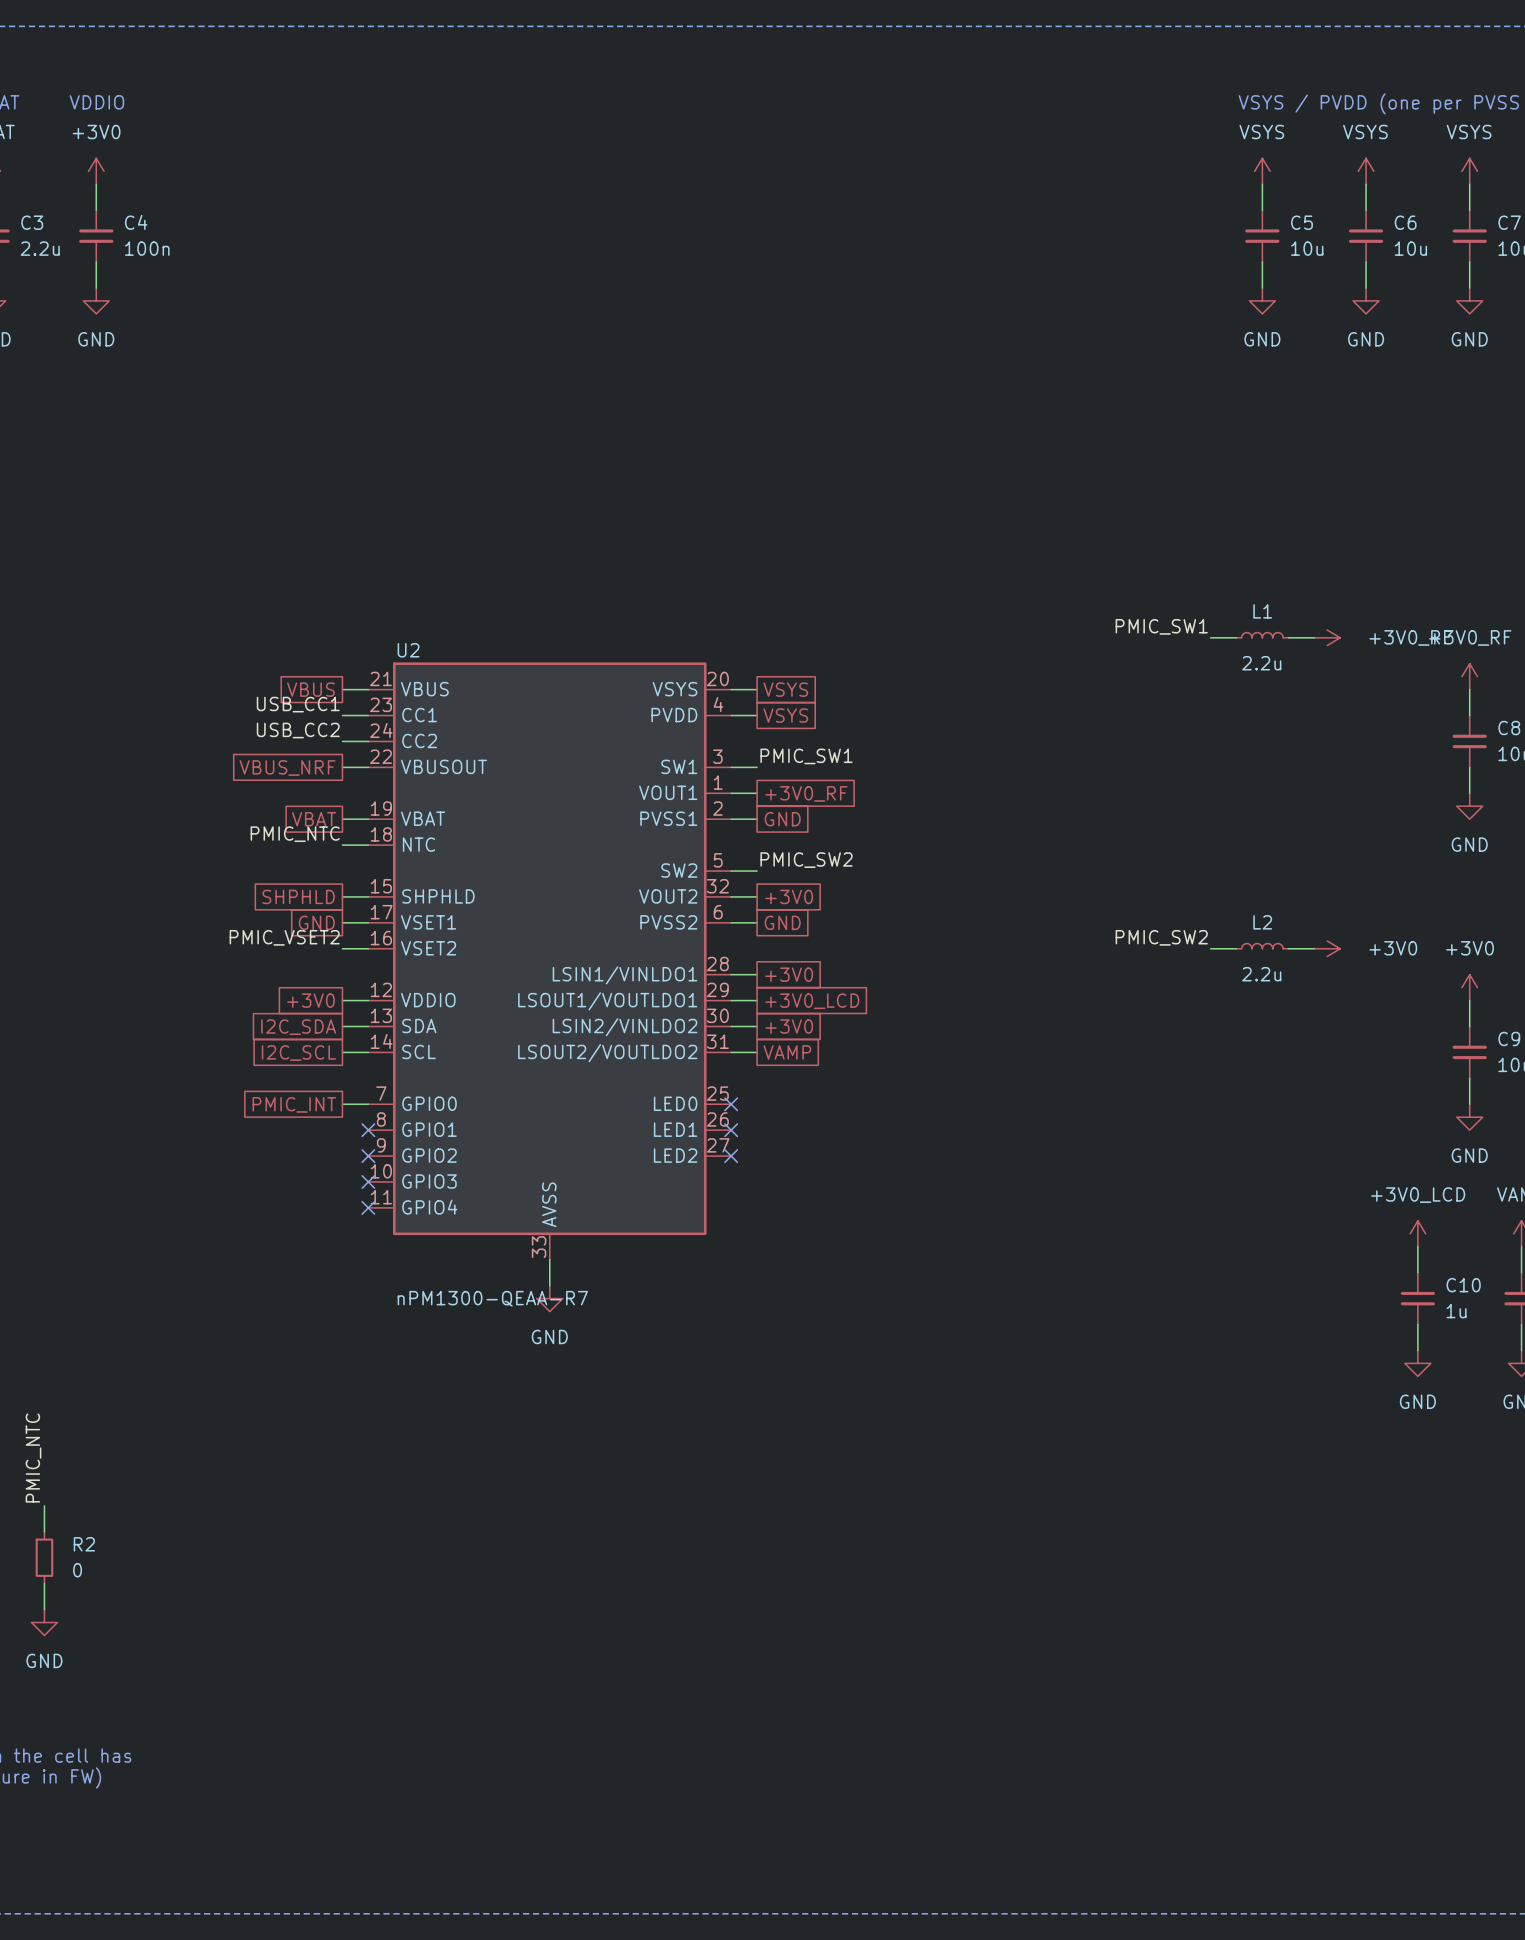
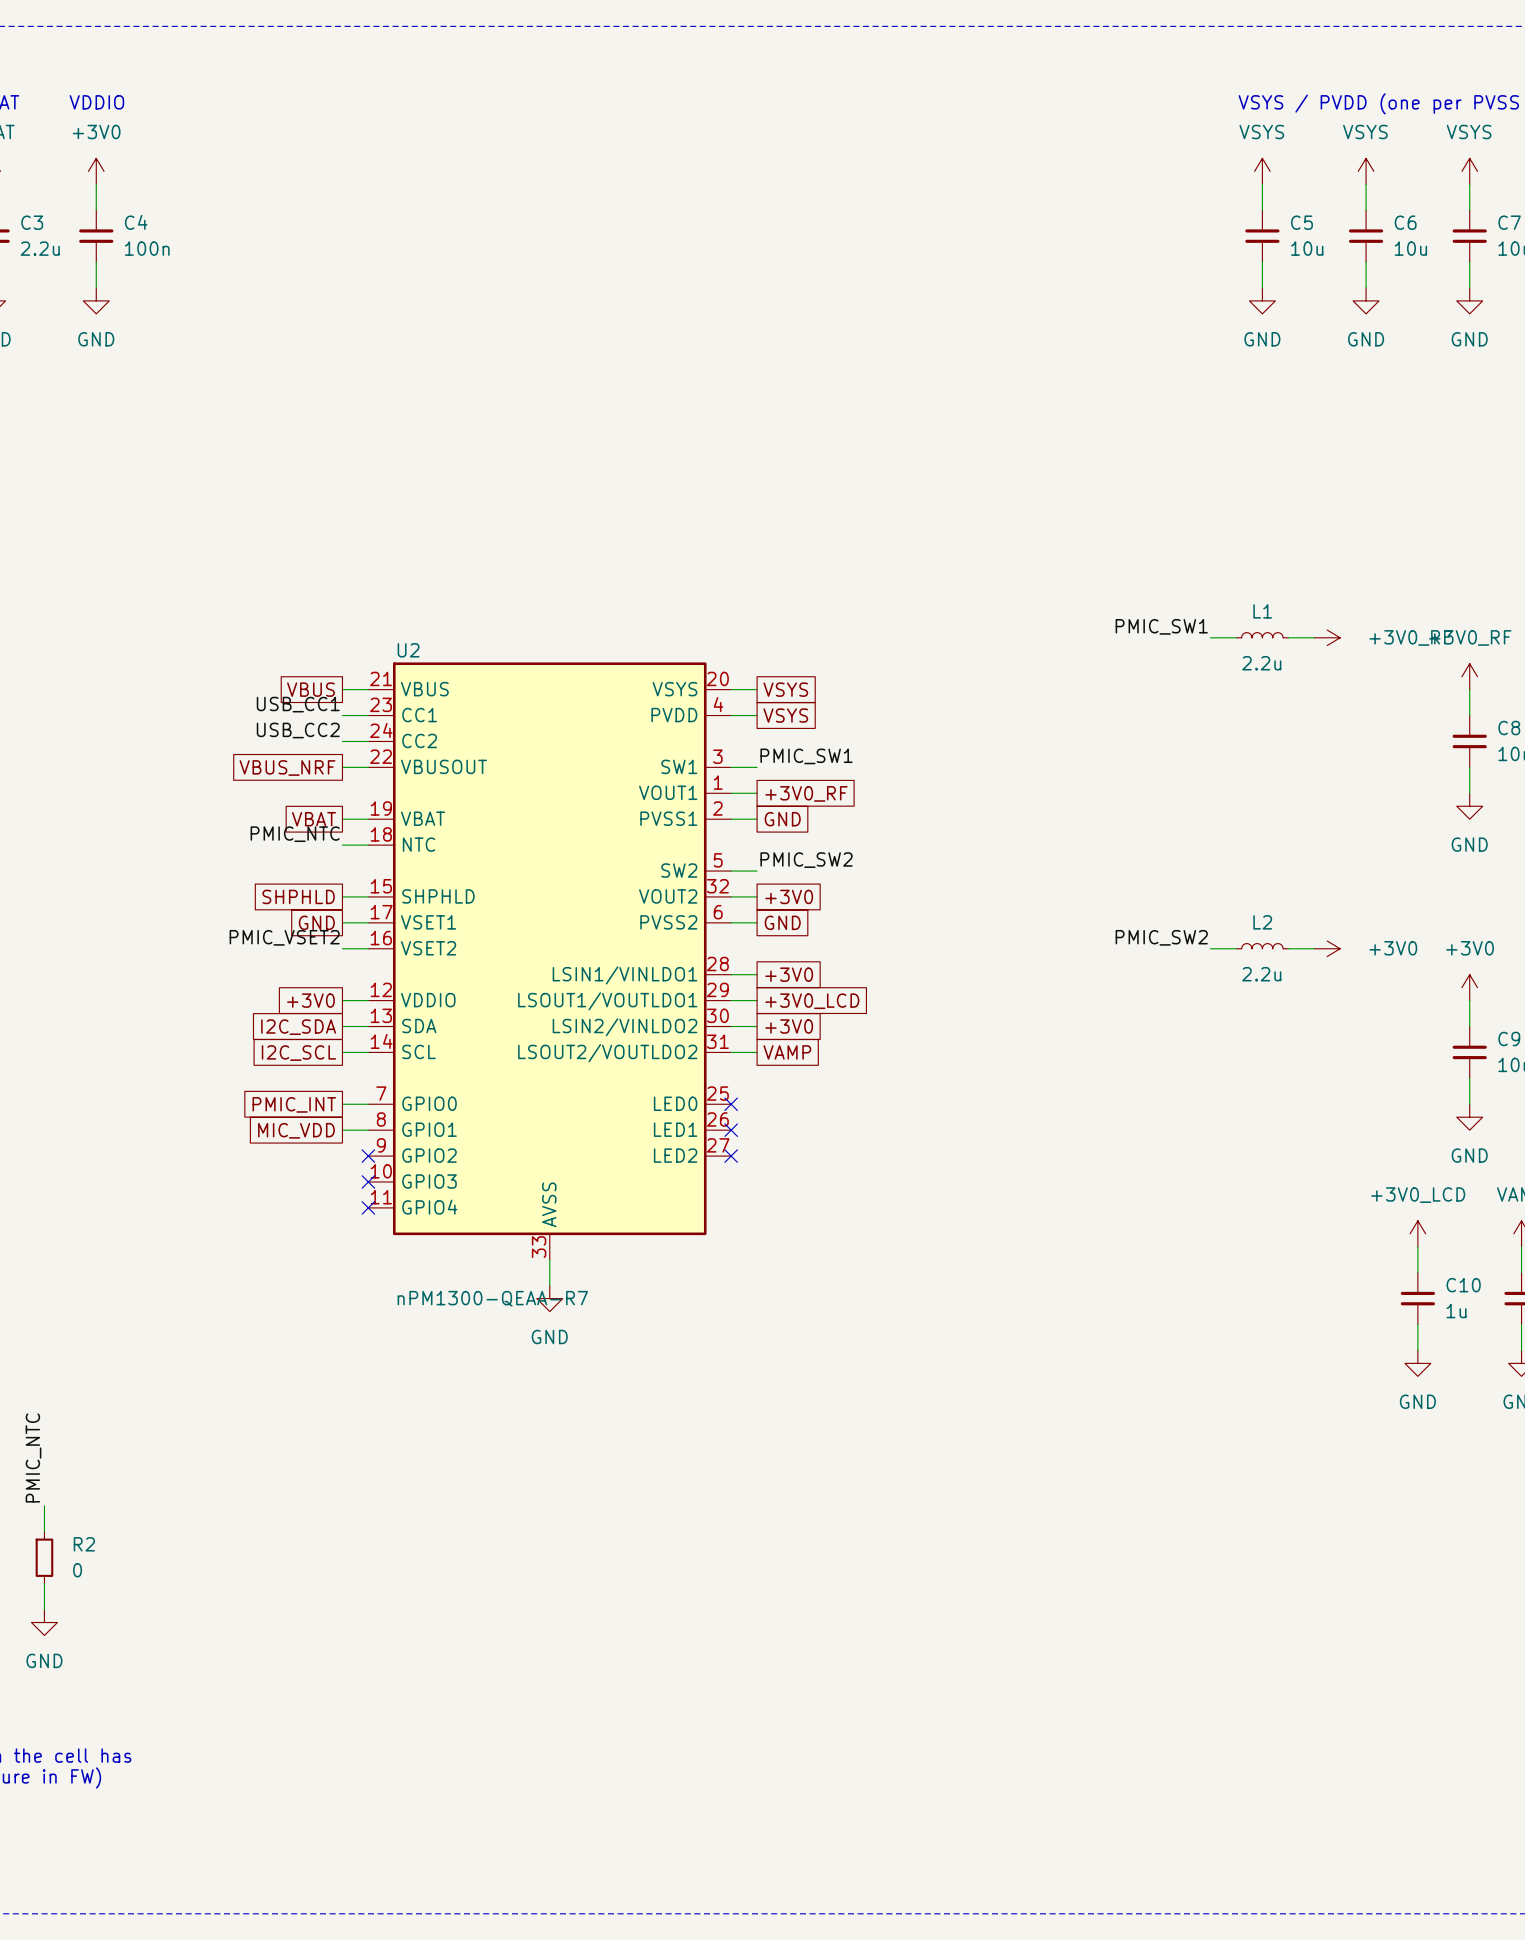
global label: none -> MIC_VDD (296, 1130)
wire: none -> (342, 1130) (368, 1130)
no-connect mark: (368, 1130) -> none

